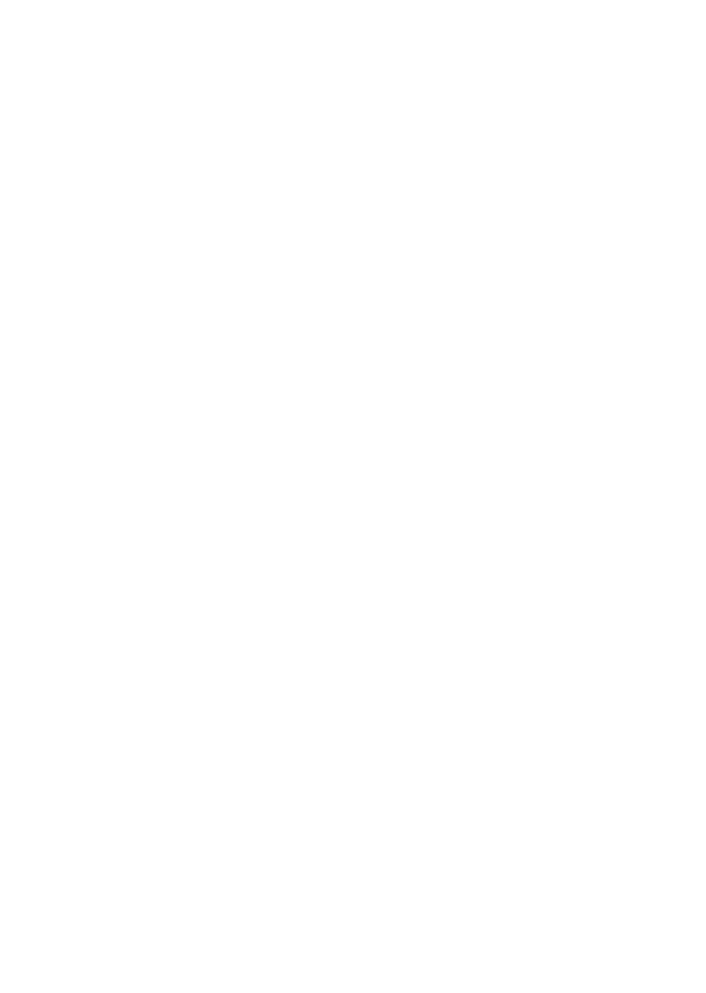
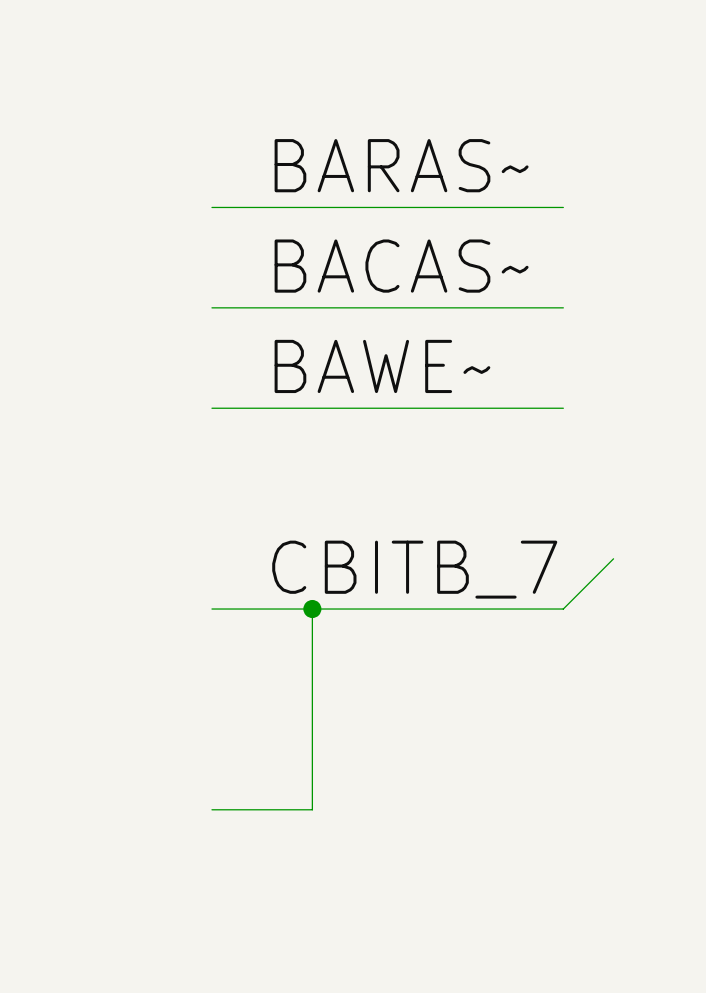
label: none -> BARAS~ (401, 165)
wire: none -> (211, 207) (563, 207)
label: none -> BACAS~ (401, 266)
wire: none -> (211, 307) (563, 307)
label: none -> BAWE~ (382, 366)
wire: none -> (211, 408) (563, 408)
wire: none -> (613, 558) (563, 609) (211, 609)
label: none -> CBITB_7 (414, 569)
wire: none -> (312, 609) (312, 809) (211, 809)
junction: none -> (312, 609)

